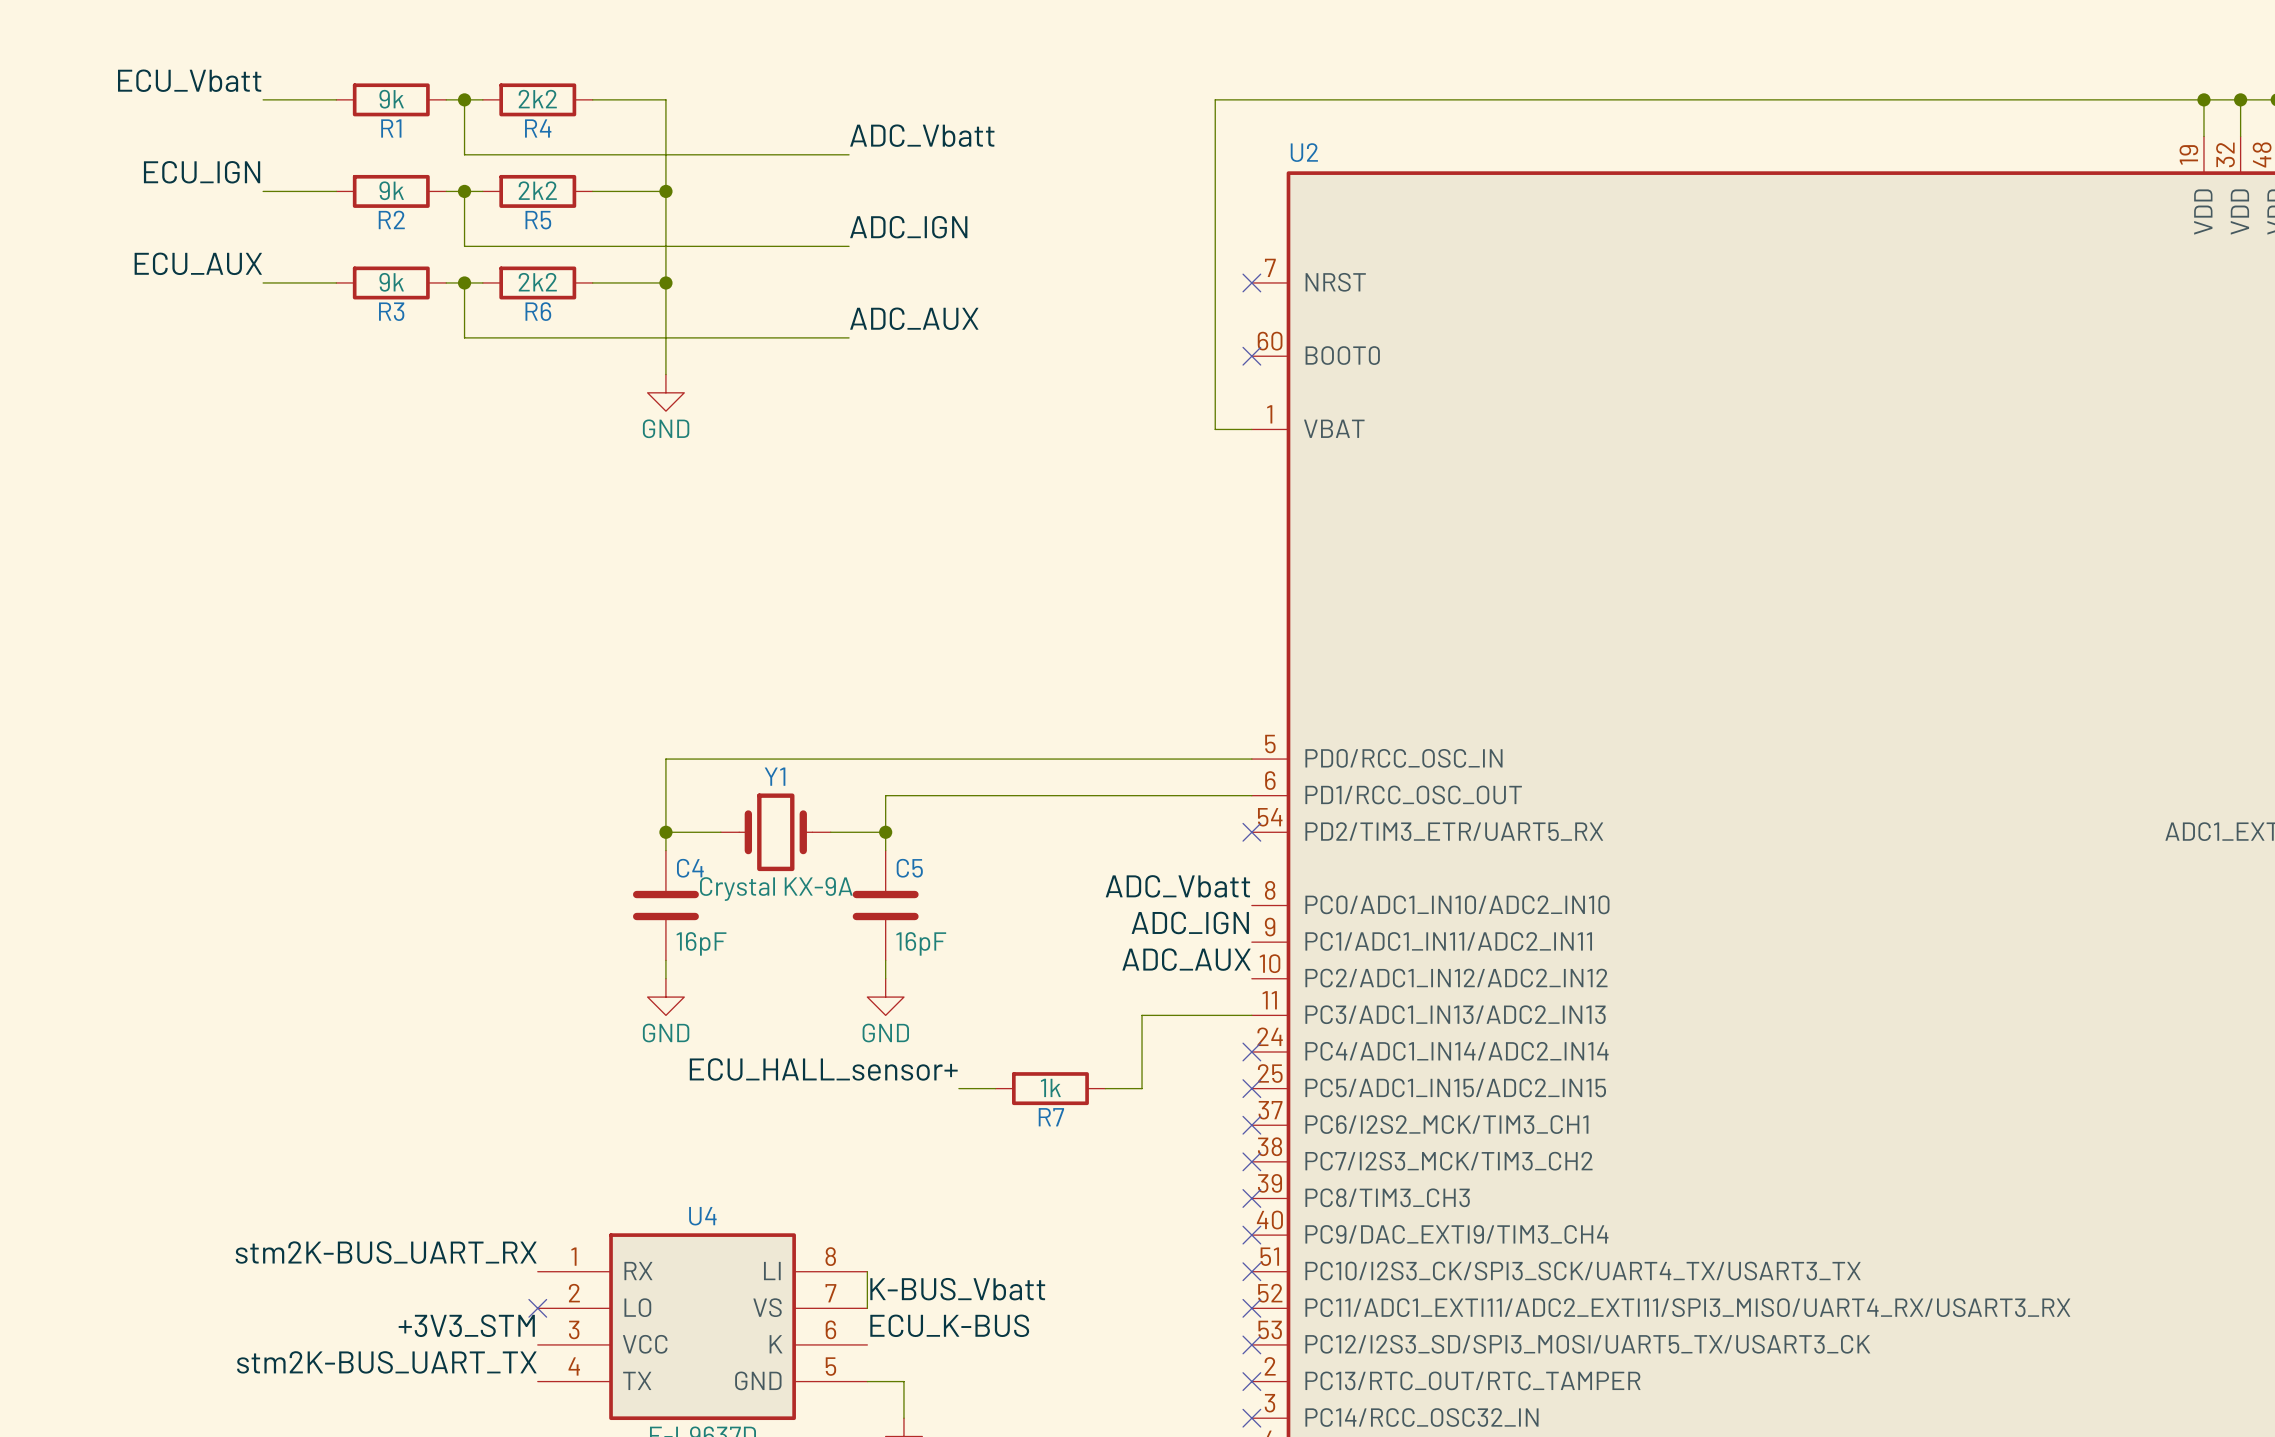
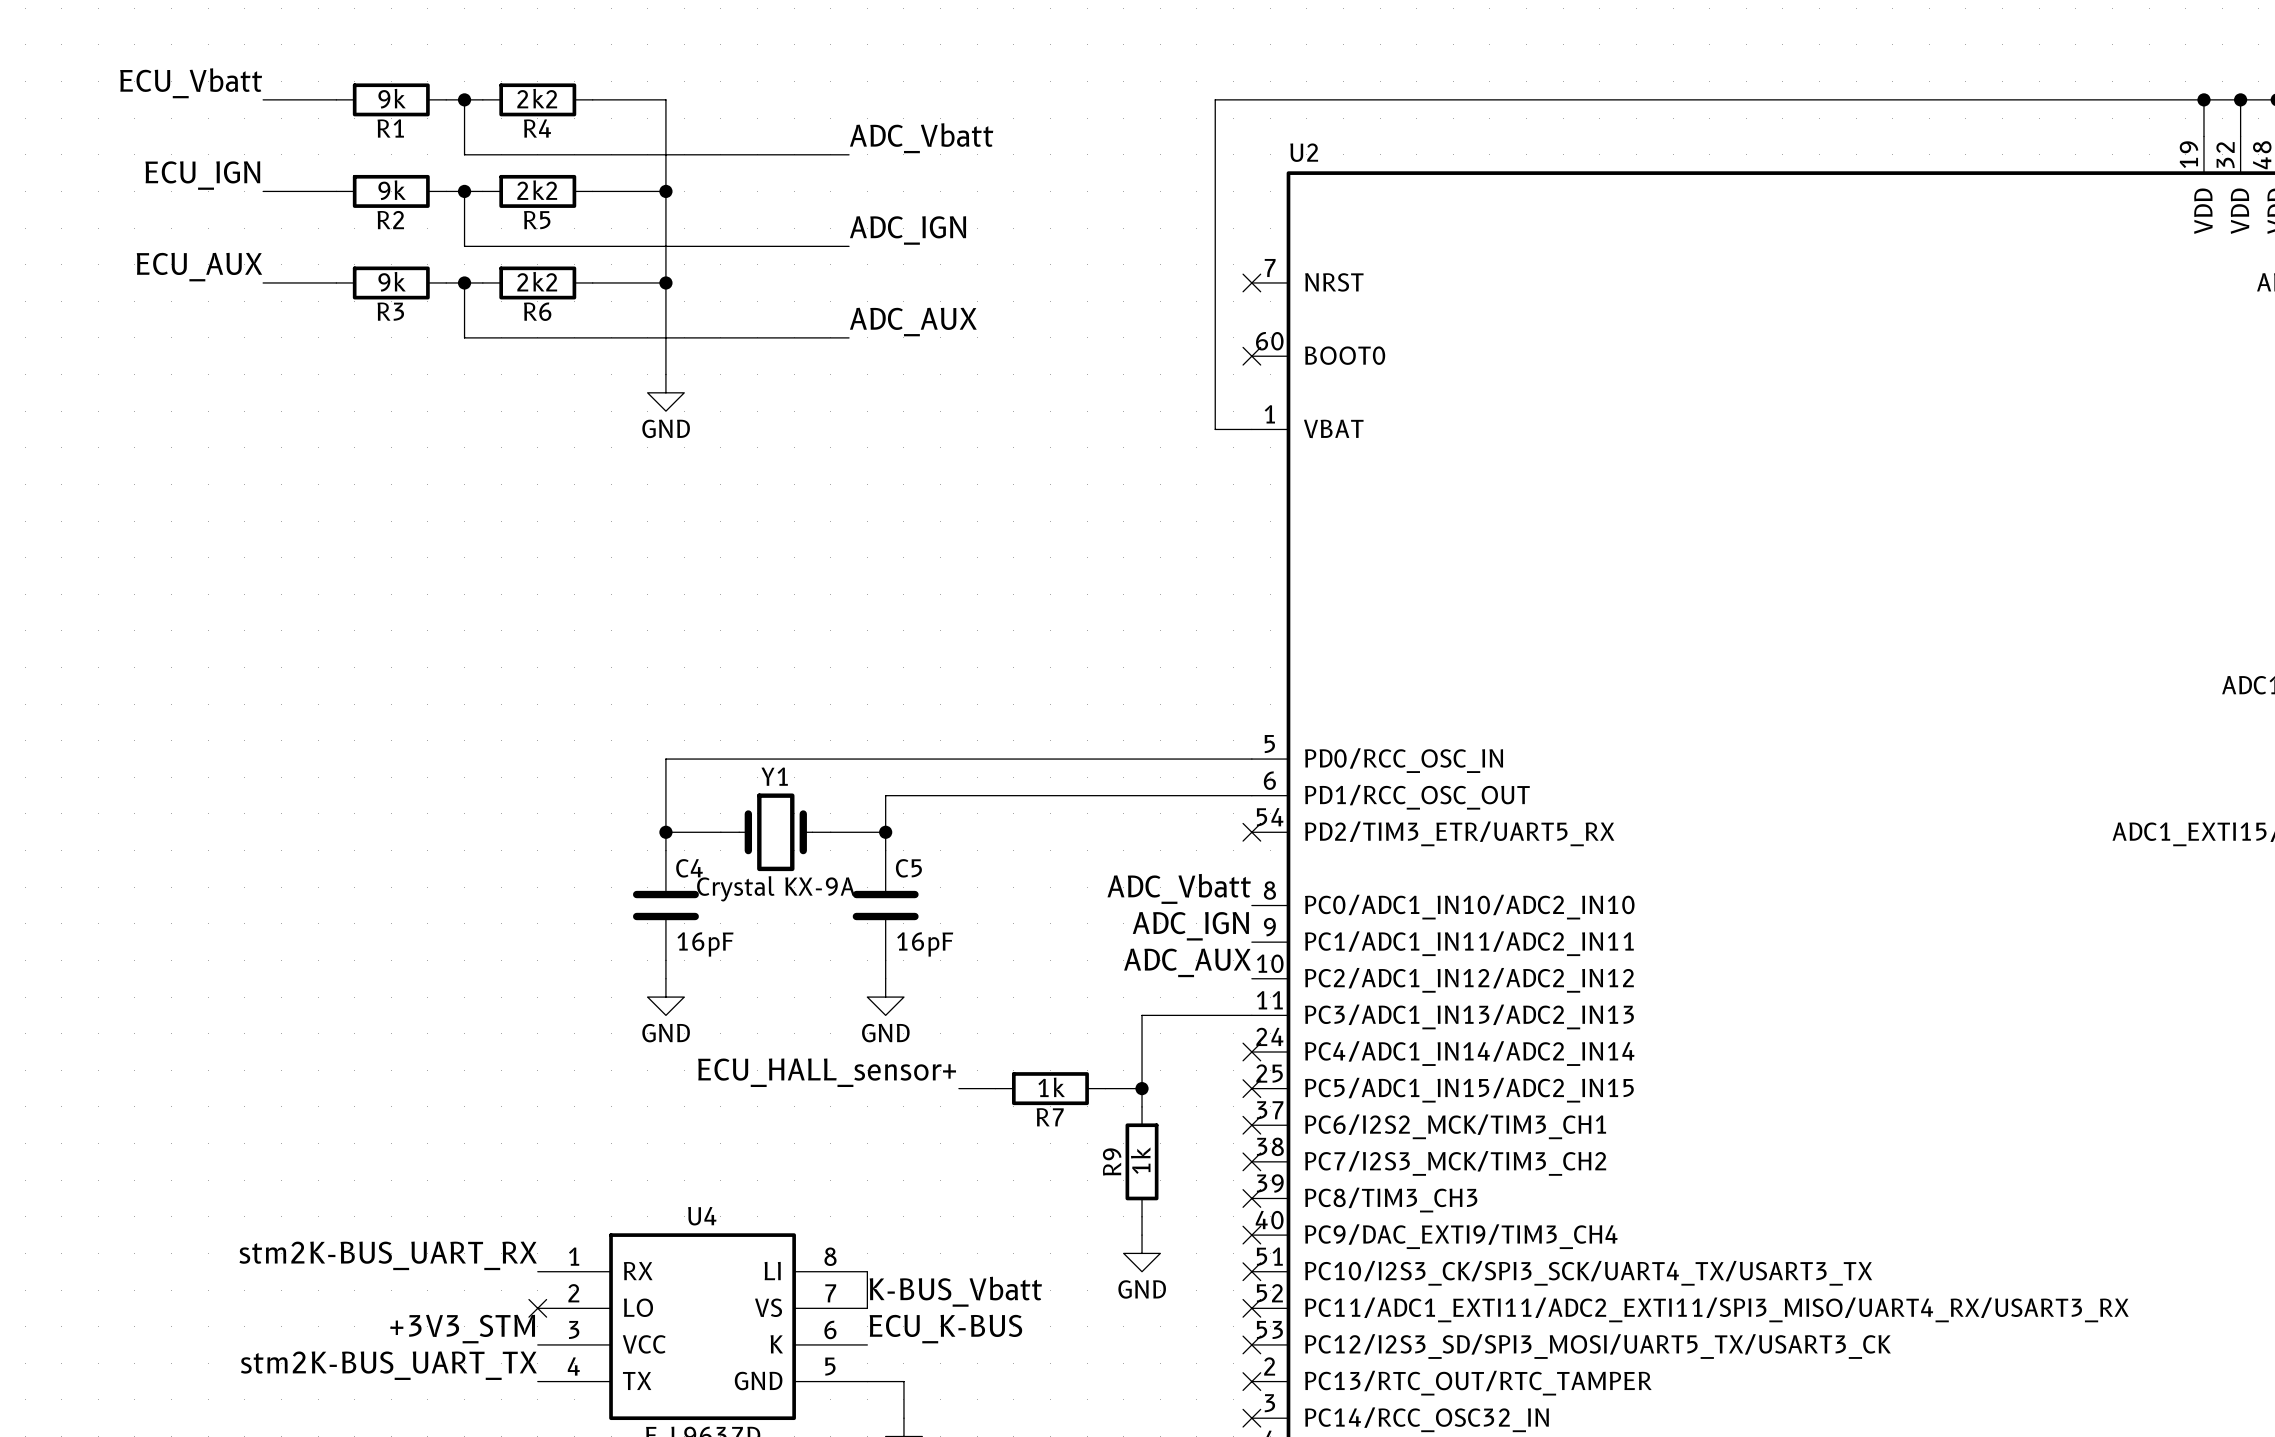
wire: none -> (1142, 1088) (1142, 1106)
junction: none -> (1142, 1088)
R9: none -> 1k (1142, 1161)
wire: none -> (1142, 1216) (1142, 1235)
power symbol: none -> GND (1142, 1253)

